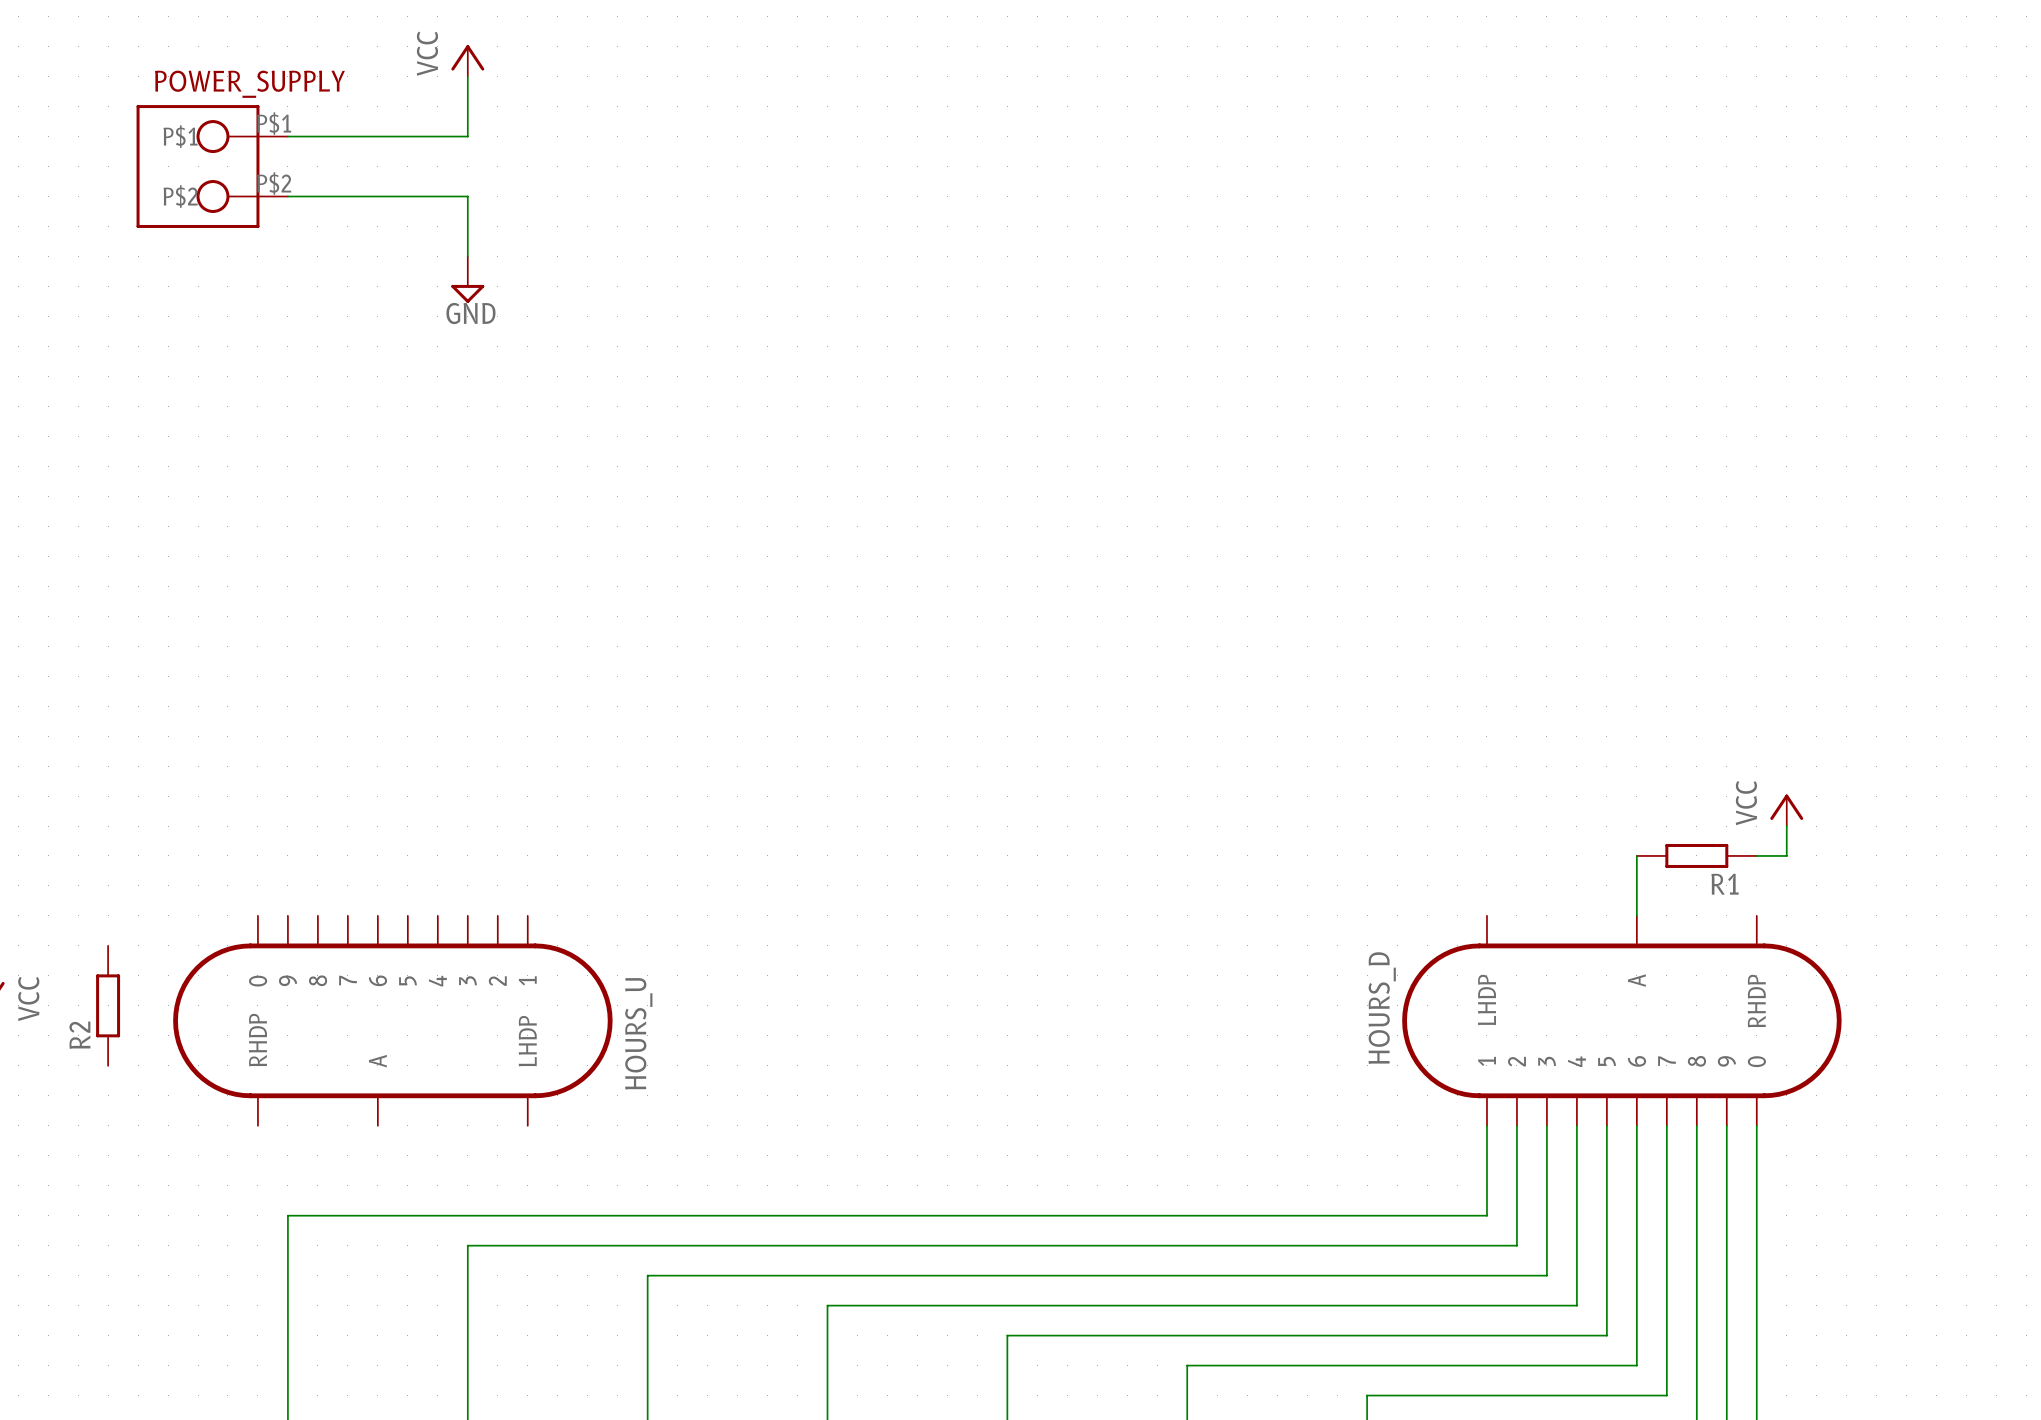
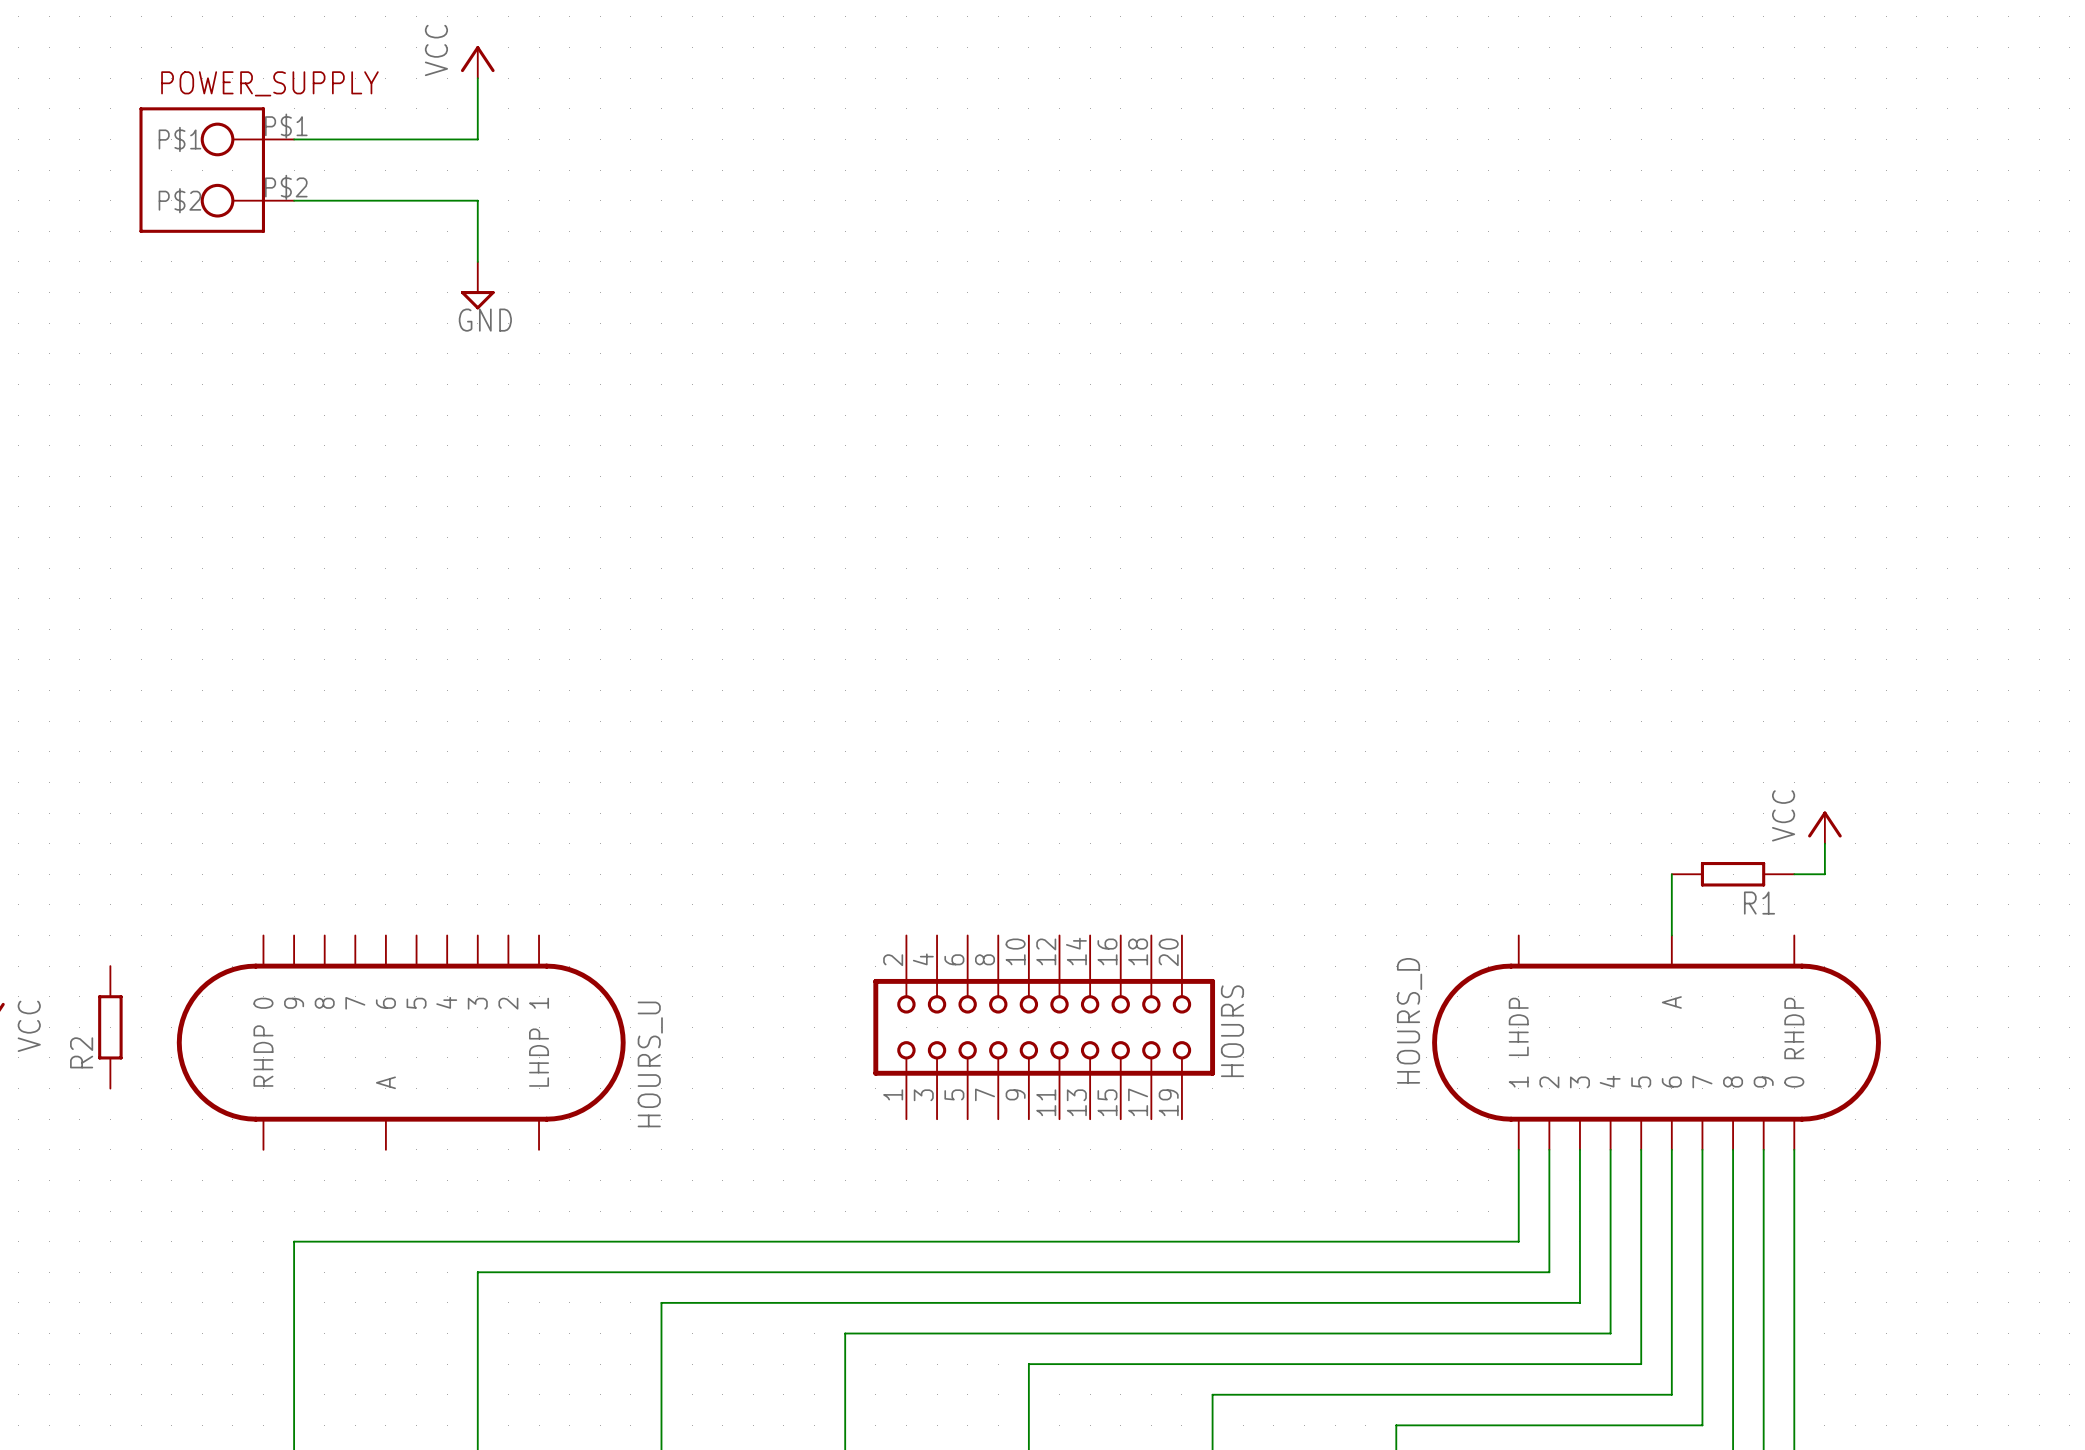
HOURS: none -> (1044, 1027)

